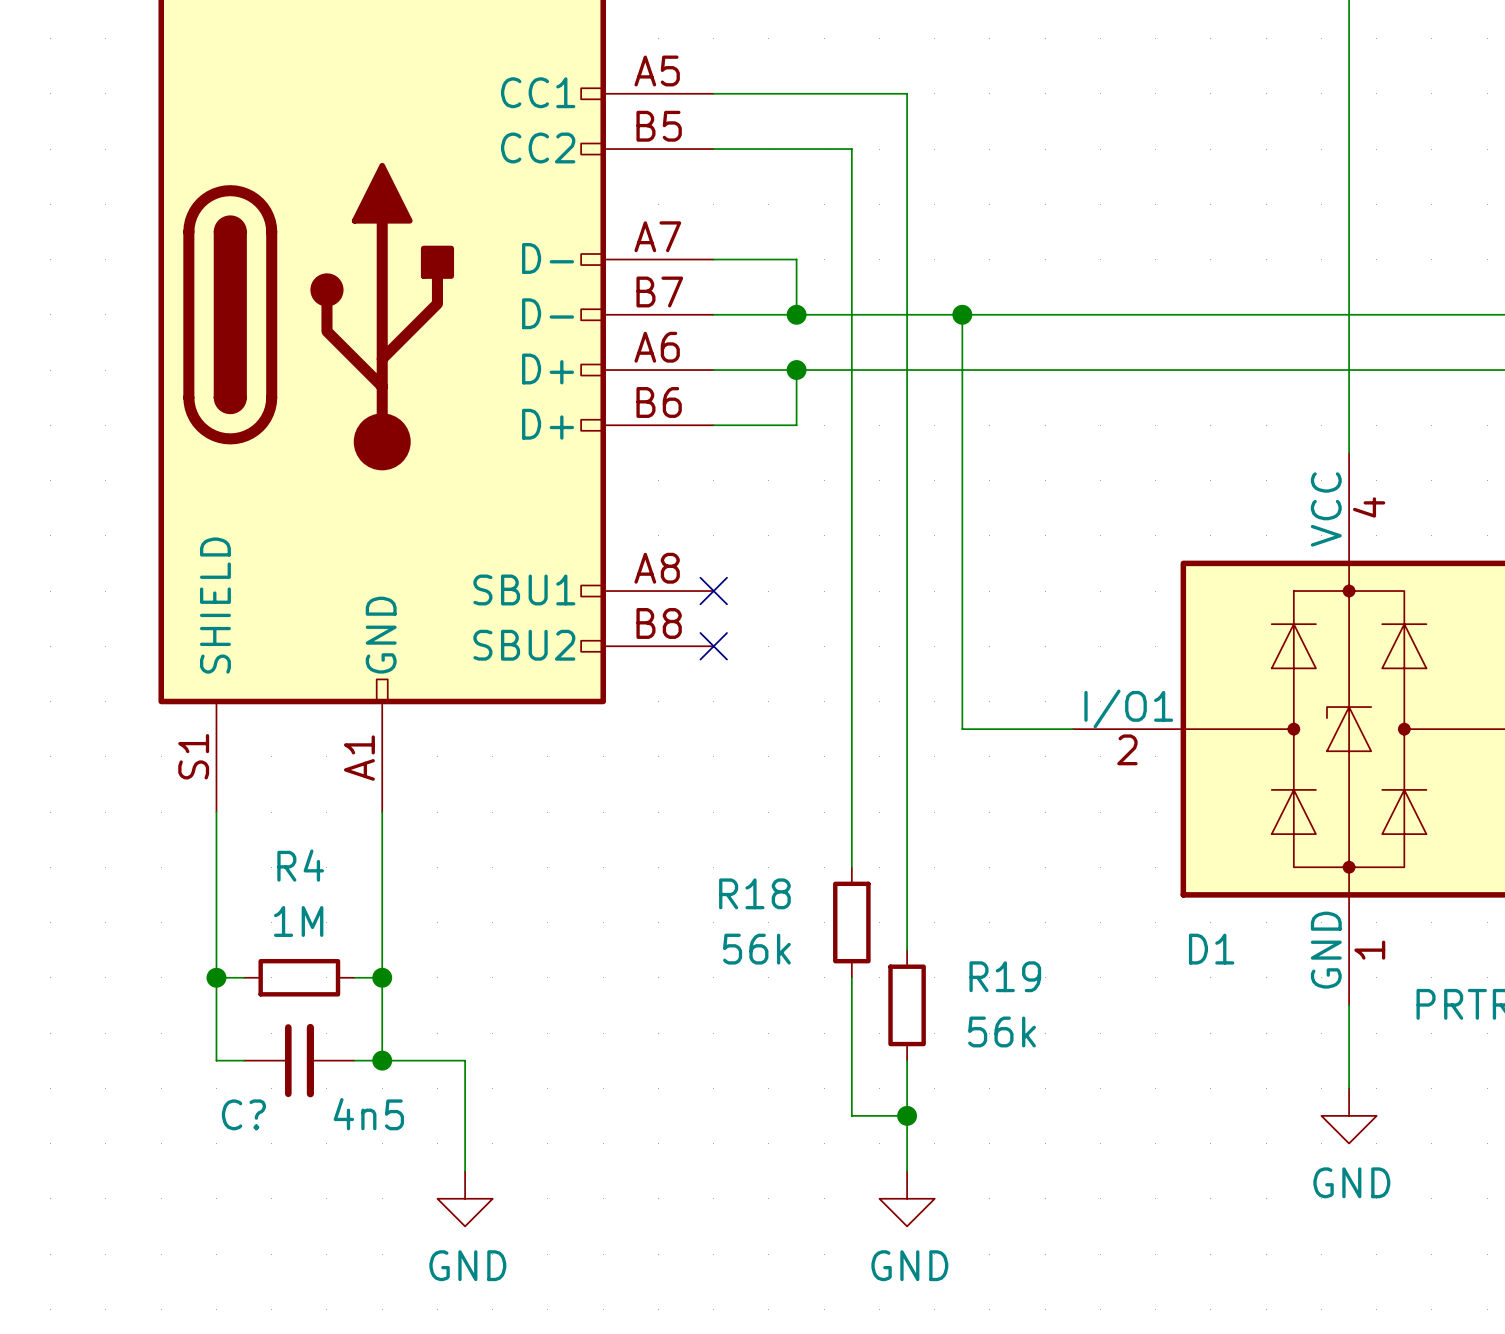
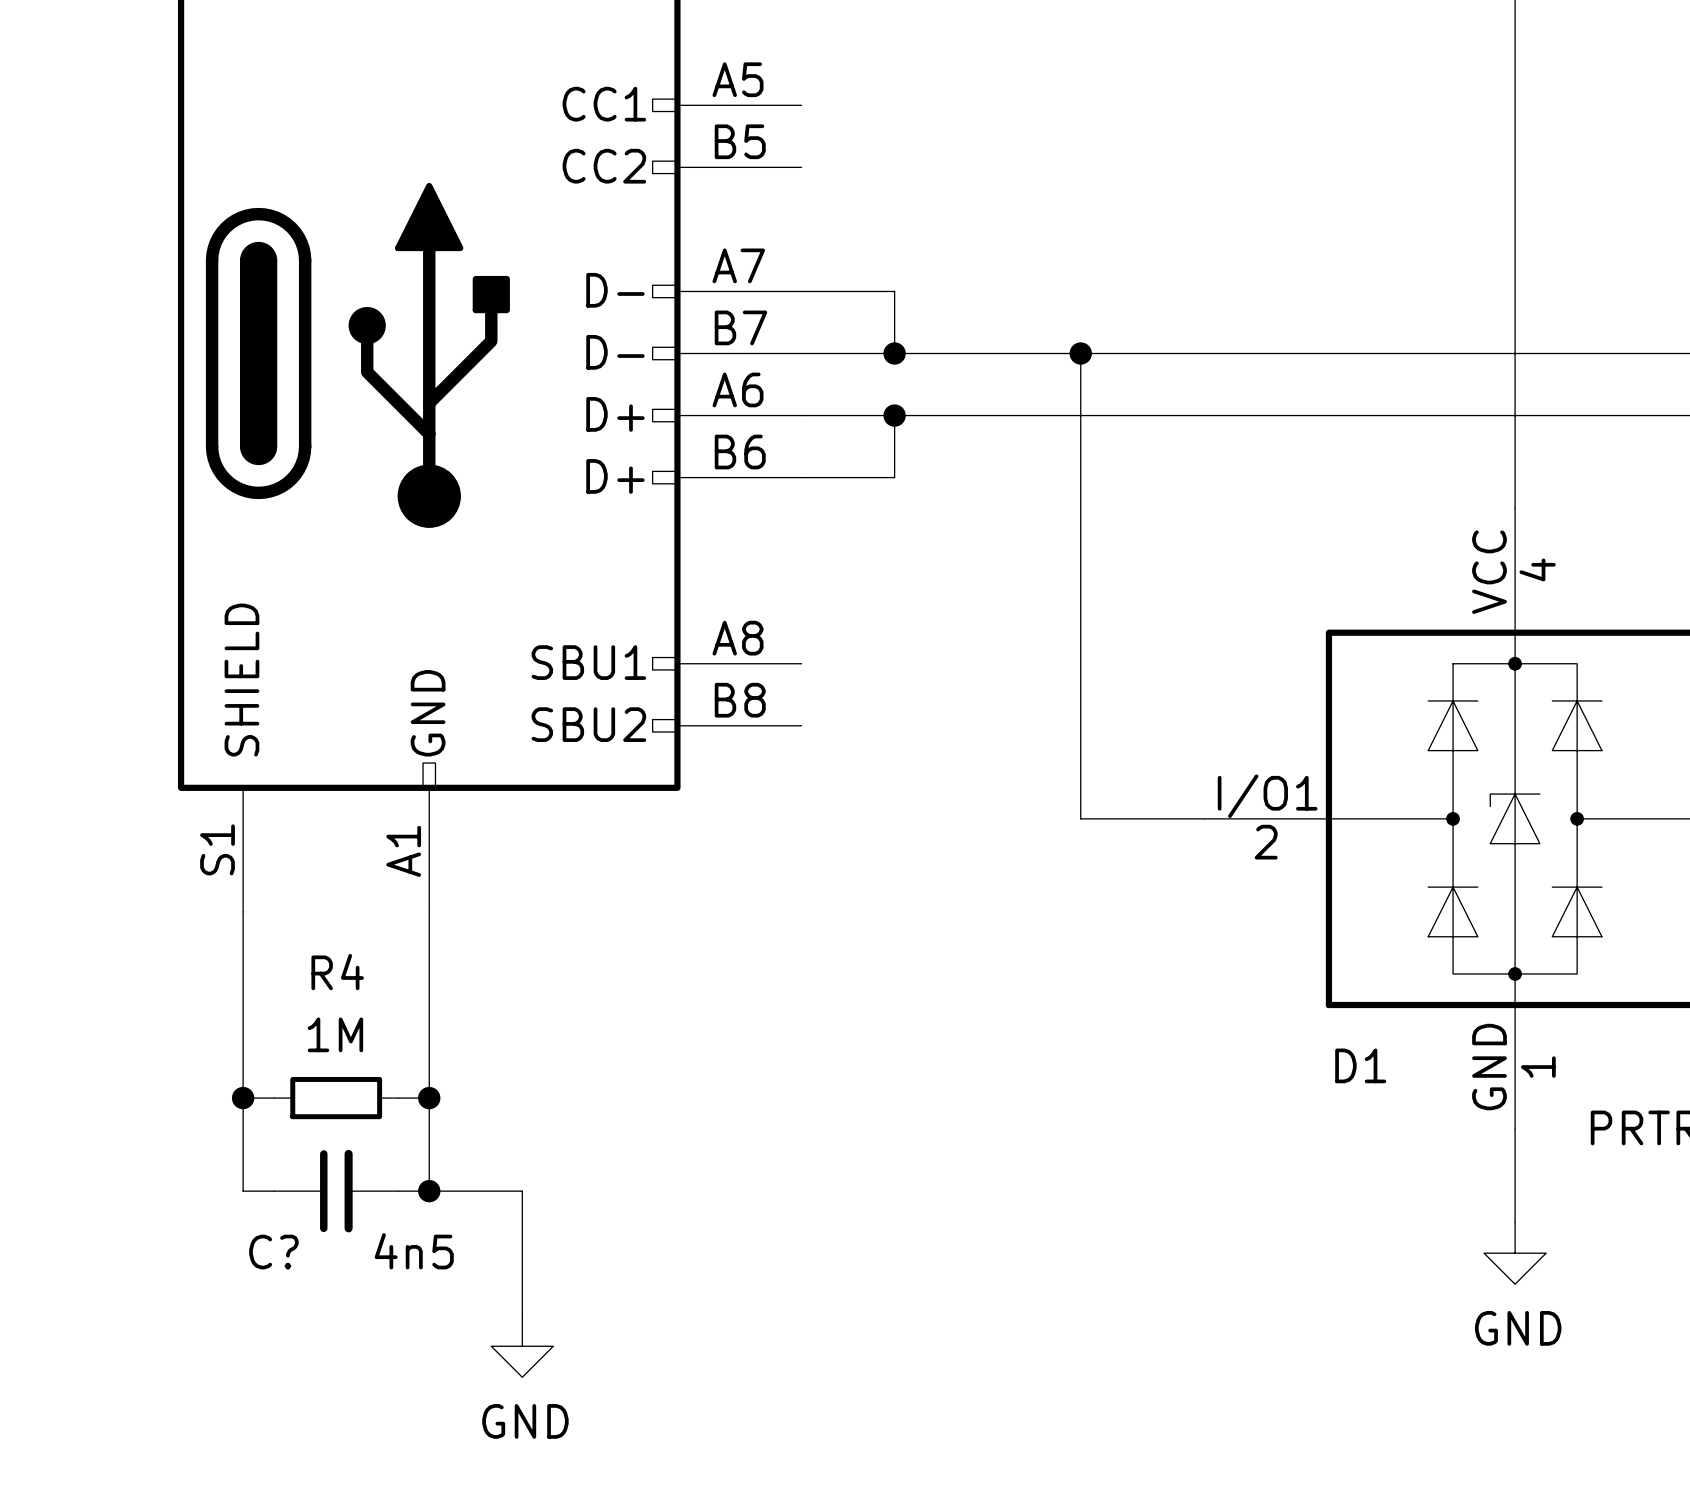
wire: (713, 93) (907, 93) (907, 950) -> none
wire: (713, 149) (851, 149) (851, 867) -> none
no-connect mark: (713, 591) -> none
no-connect mark: (713, 646) -> none
R18: 56k (851, 922) -> none
wire: (851, 977) (851, 1115) (907, 1115) -> none
R19: 56k (907, 1005) -> none
wire: (907, 1060) (907, 1171) -> none
junction: (907, 1115) -> none
power symbol: GND (907, 1198) -> none

